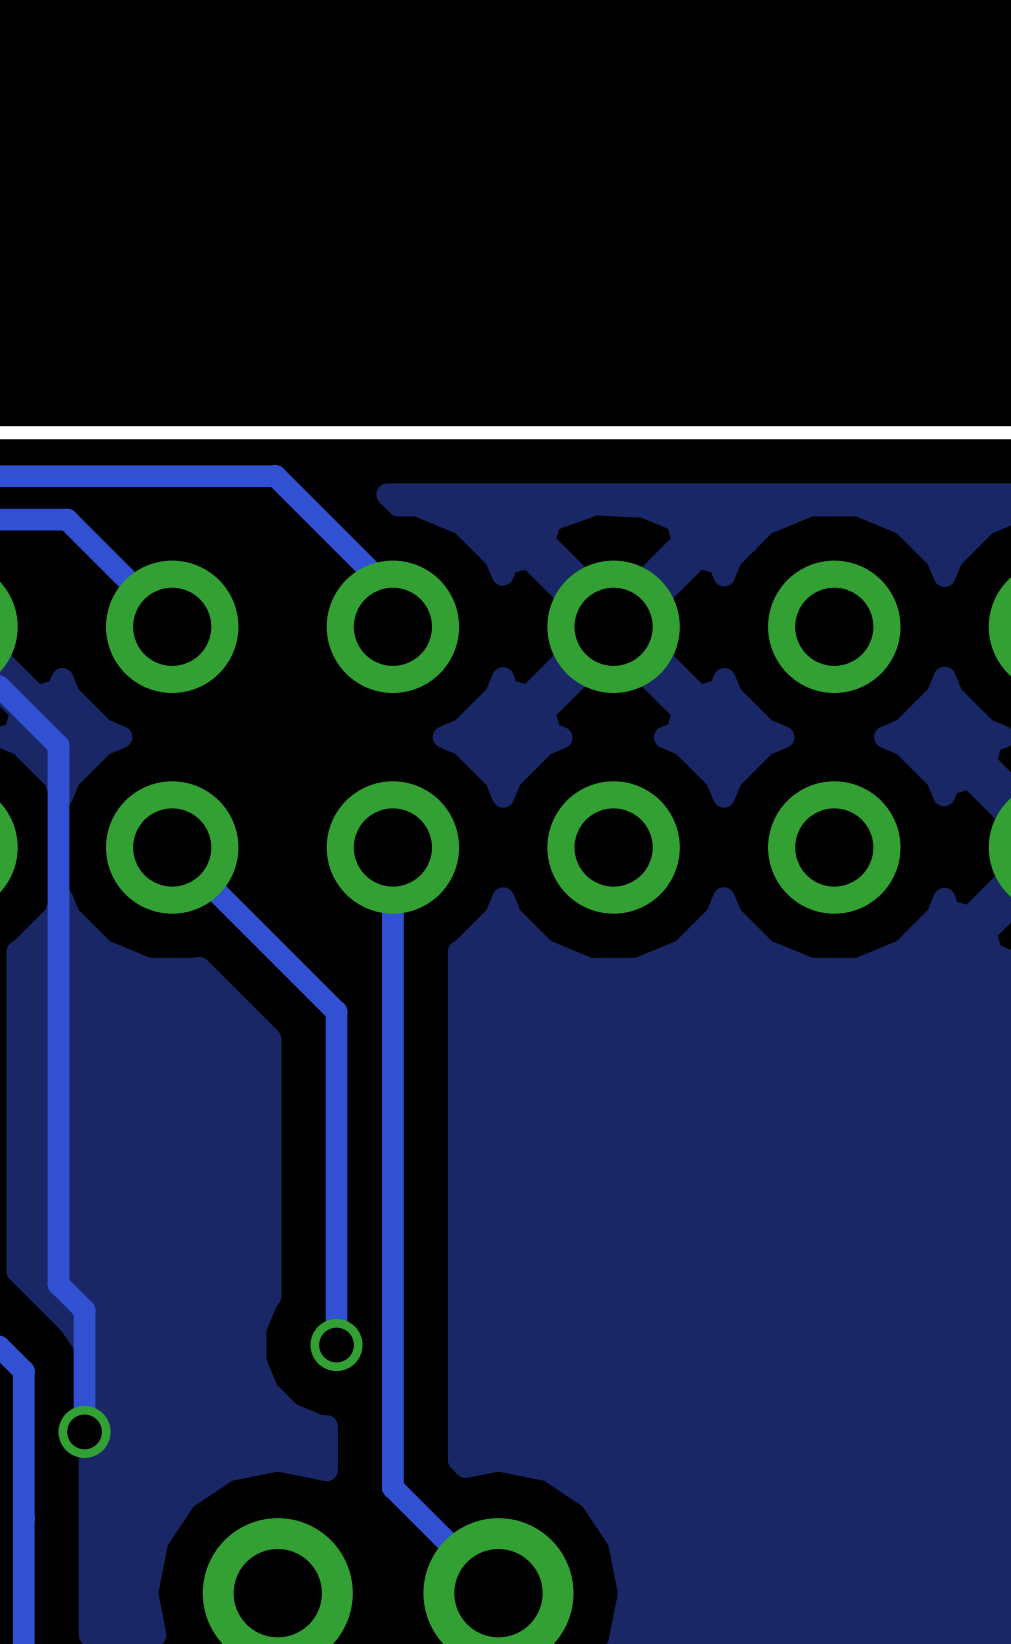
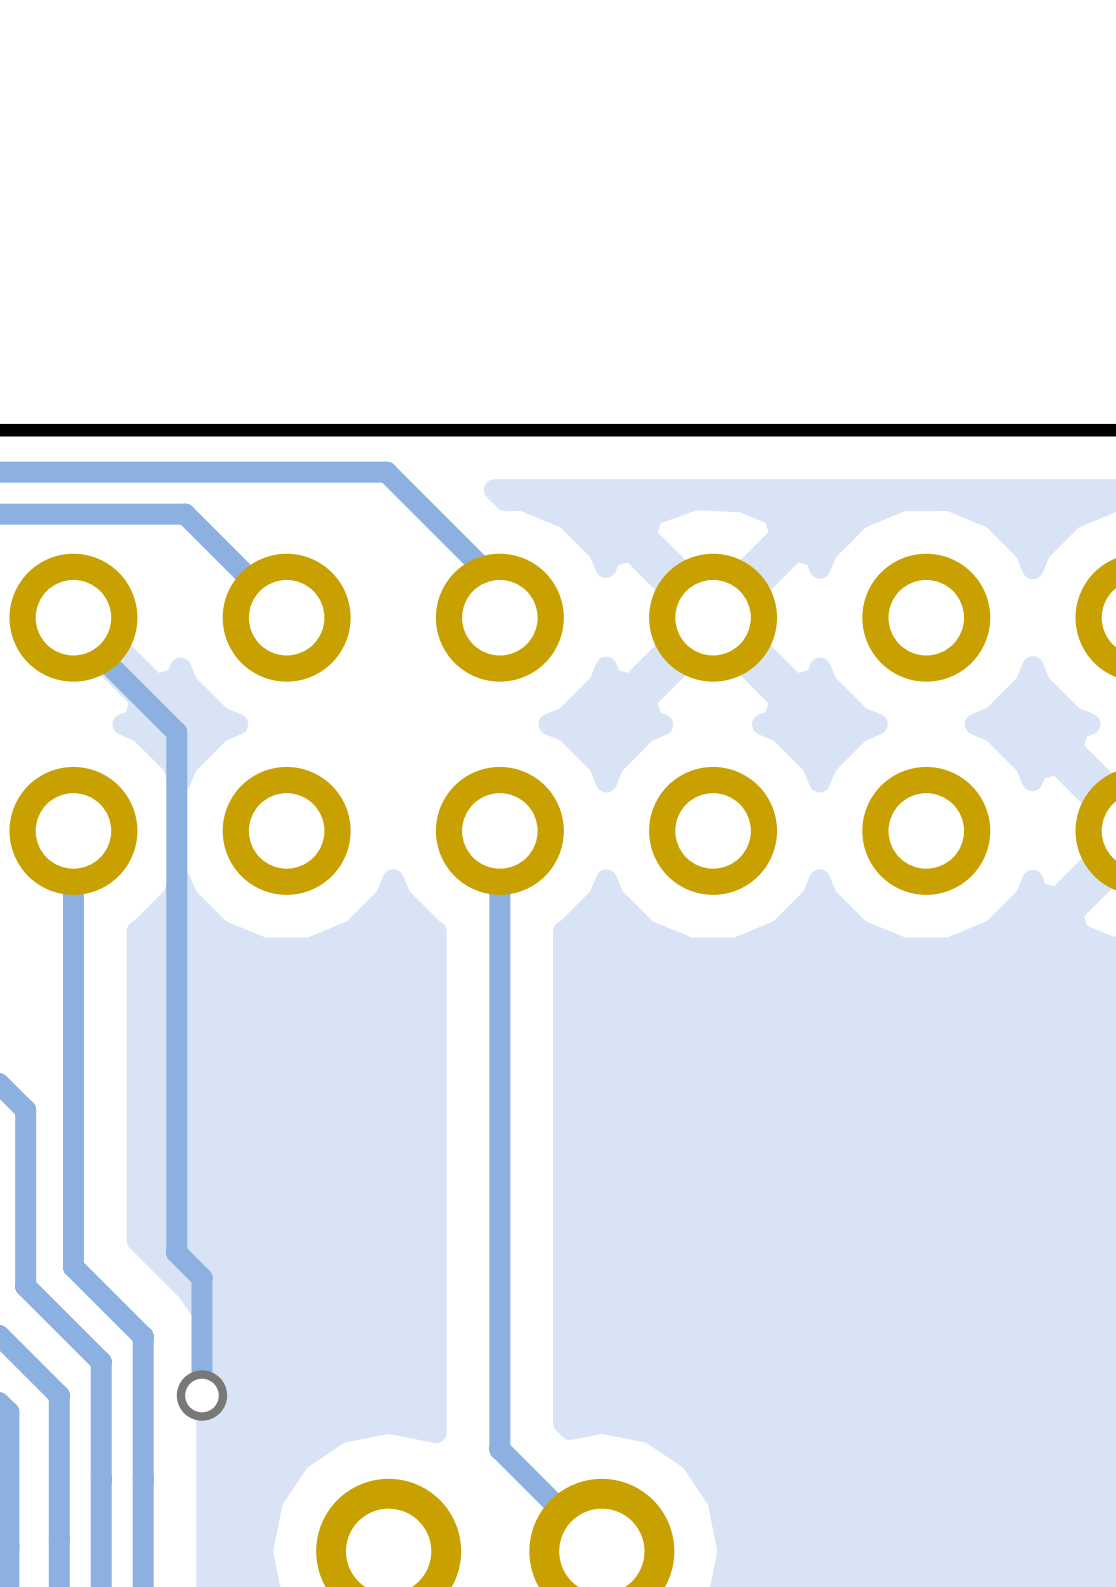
track: (172, 847) (336, 1011) (336, 1345) -> none
via: (336, 1345) -> none

